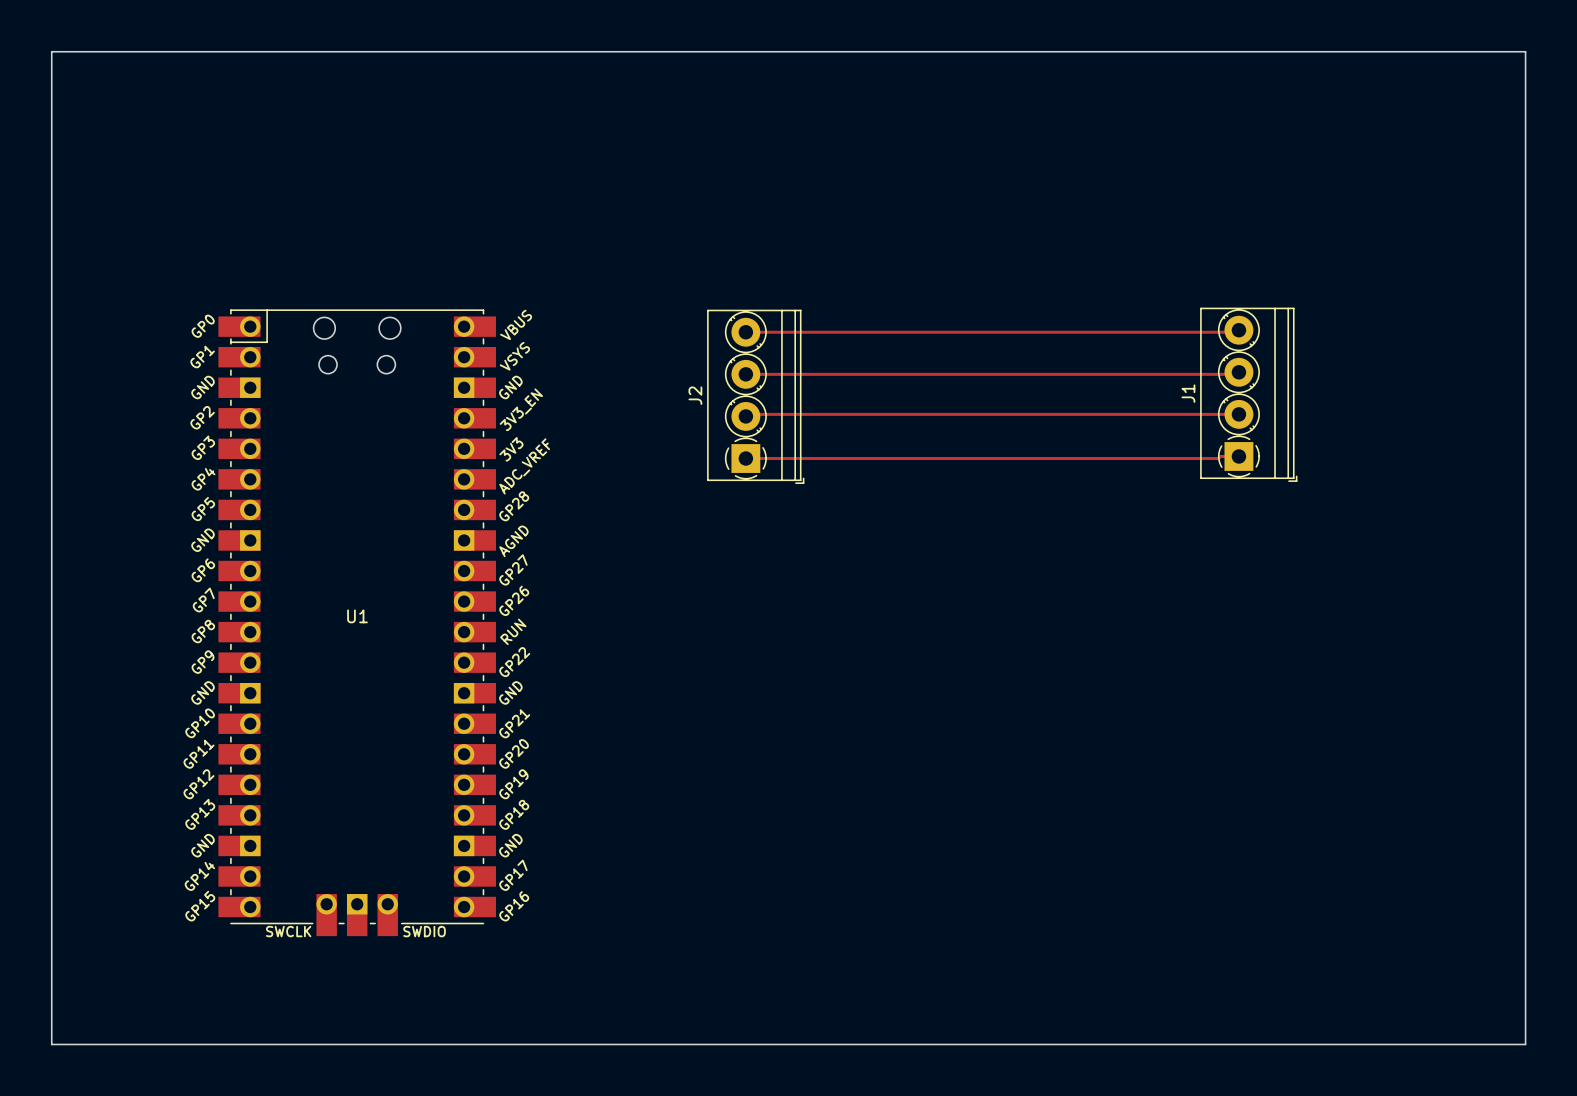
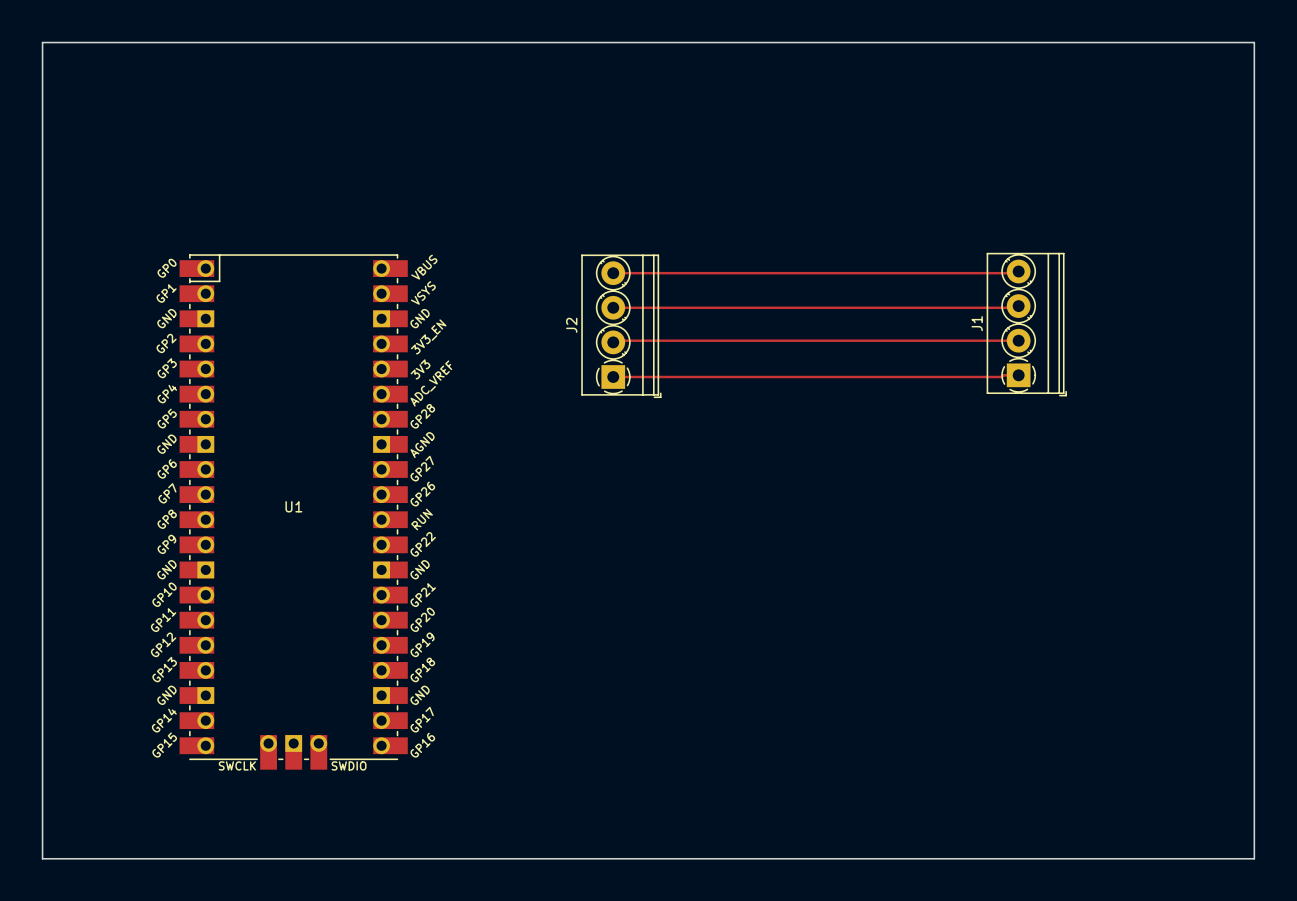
U1 footprint: [218, 309, 496, 937] -> [179, 254, 408, 770]

